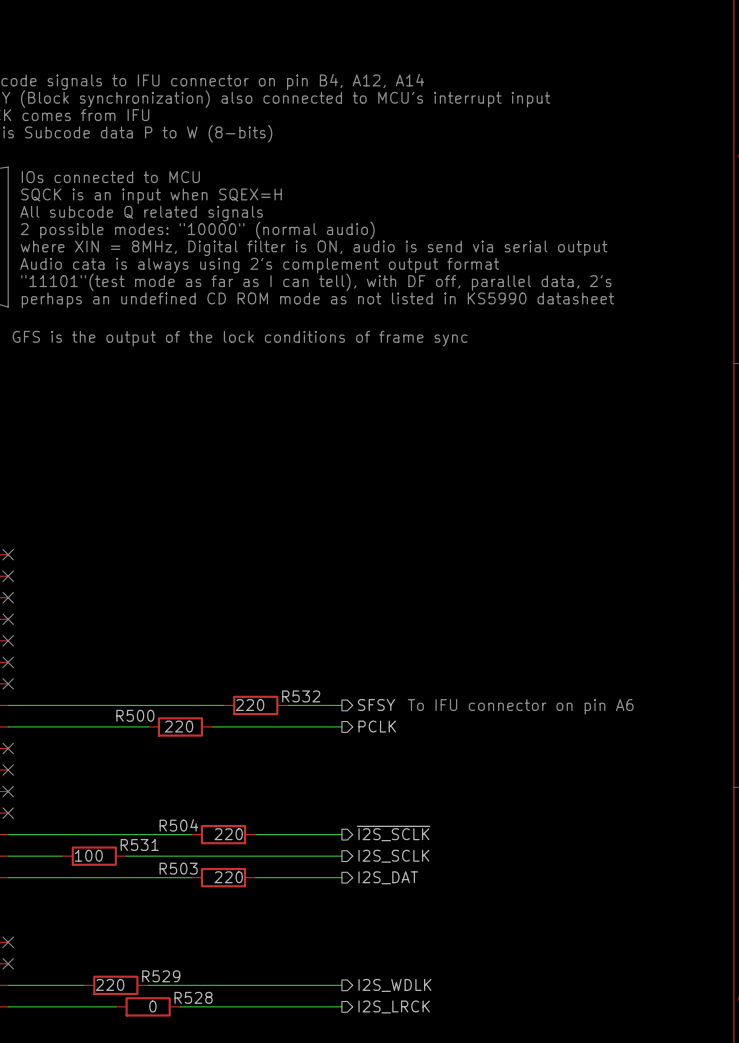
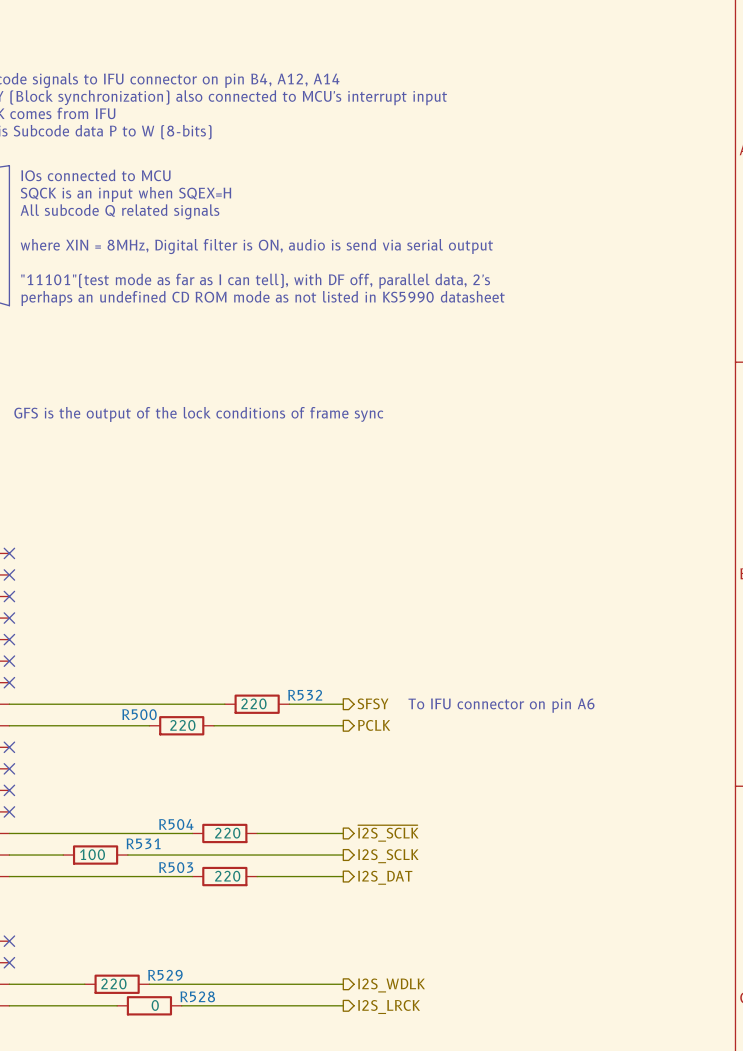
text: 2 possible modes: "10000" (normal audio) (197, 230) -> none
text: Audio cata is always using 2's complement output format (259, 265) -> none
text position: GFS is the output of the lock conditions of frame sync (240, 338) -> GFS is the output of the lock conditions of frame sync (198, 414)

